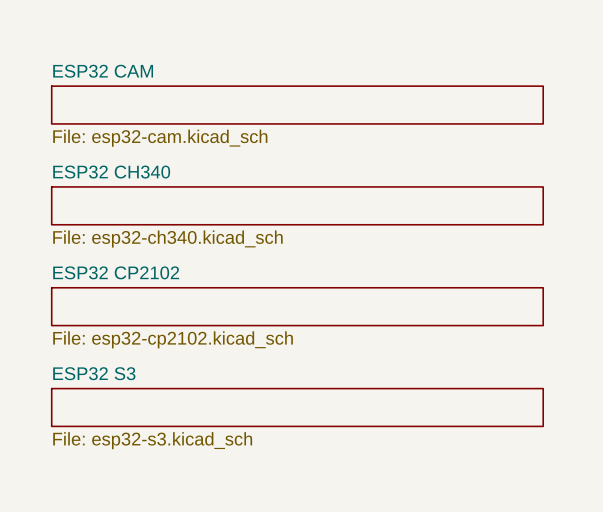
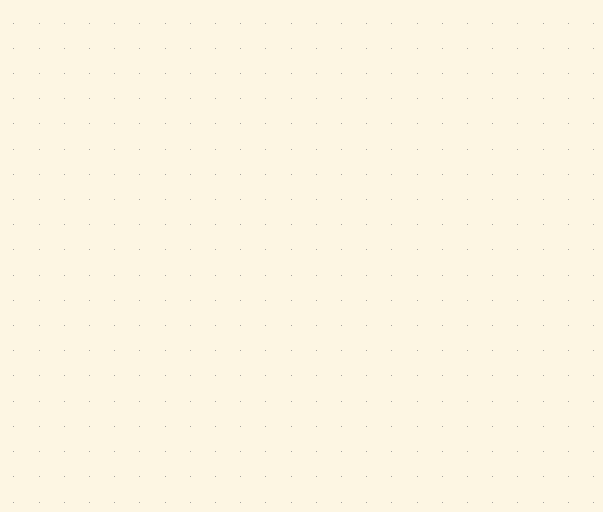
sheet ESP32 CAM: File: esp32-cam.kicad_sch (297, 105) -> none
sheet ESP32 CH340: File: esp32-ch340.kicad_sch (297, 205) -> none
sheet ESP32 CP2102: File: esp32-cp2102.kicad_sch (297, 306) -> none
sheet ESP32 S3: File: esp32-s3.kicad_sch (297, 407) -> none

